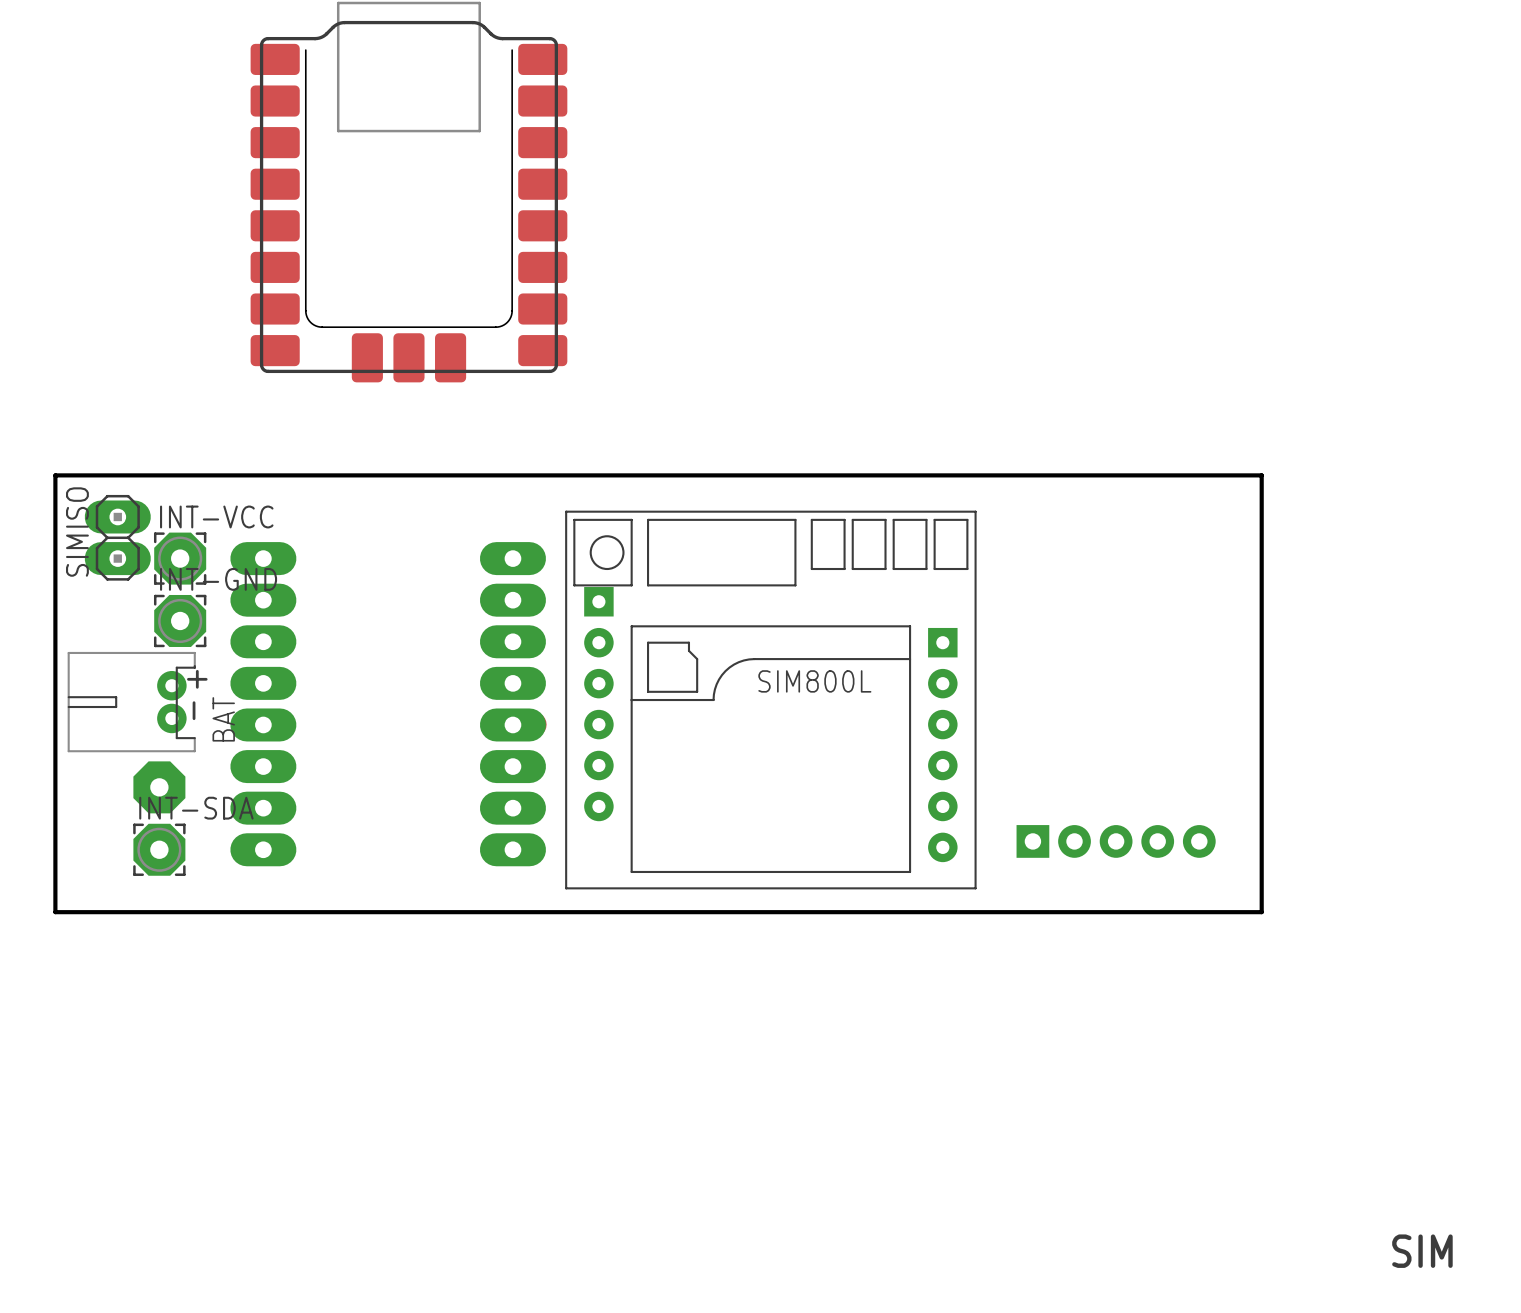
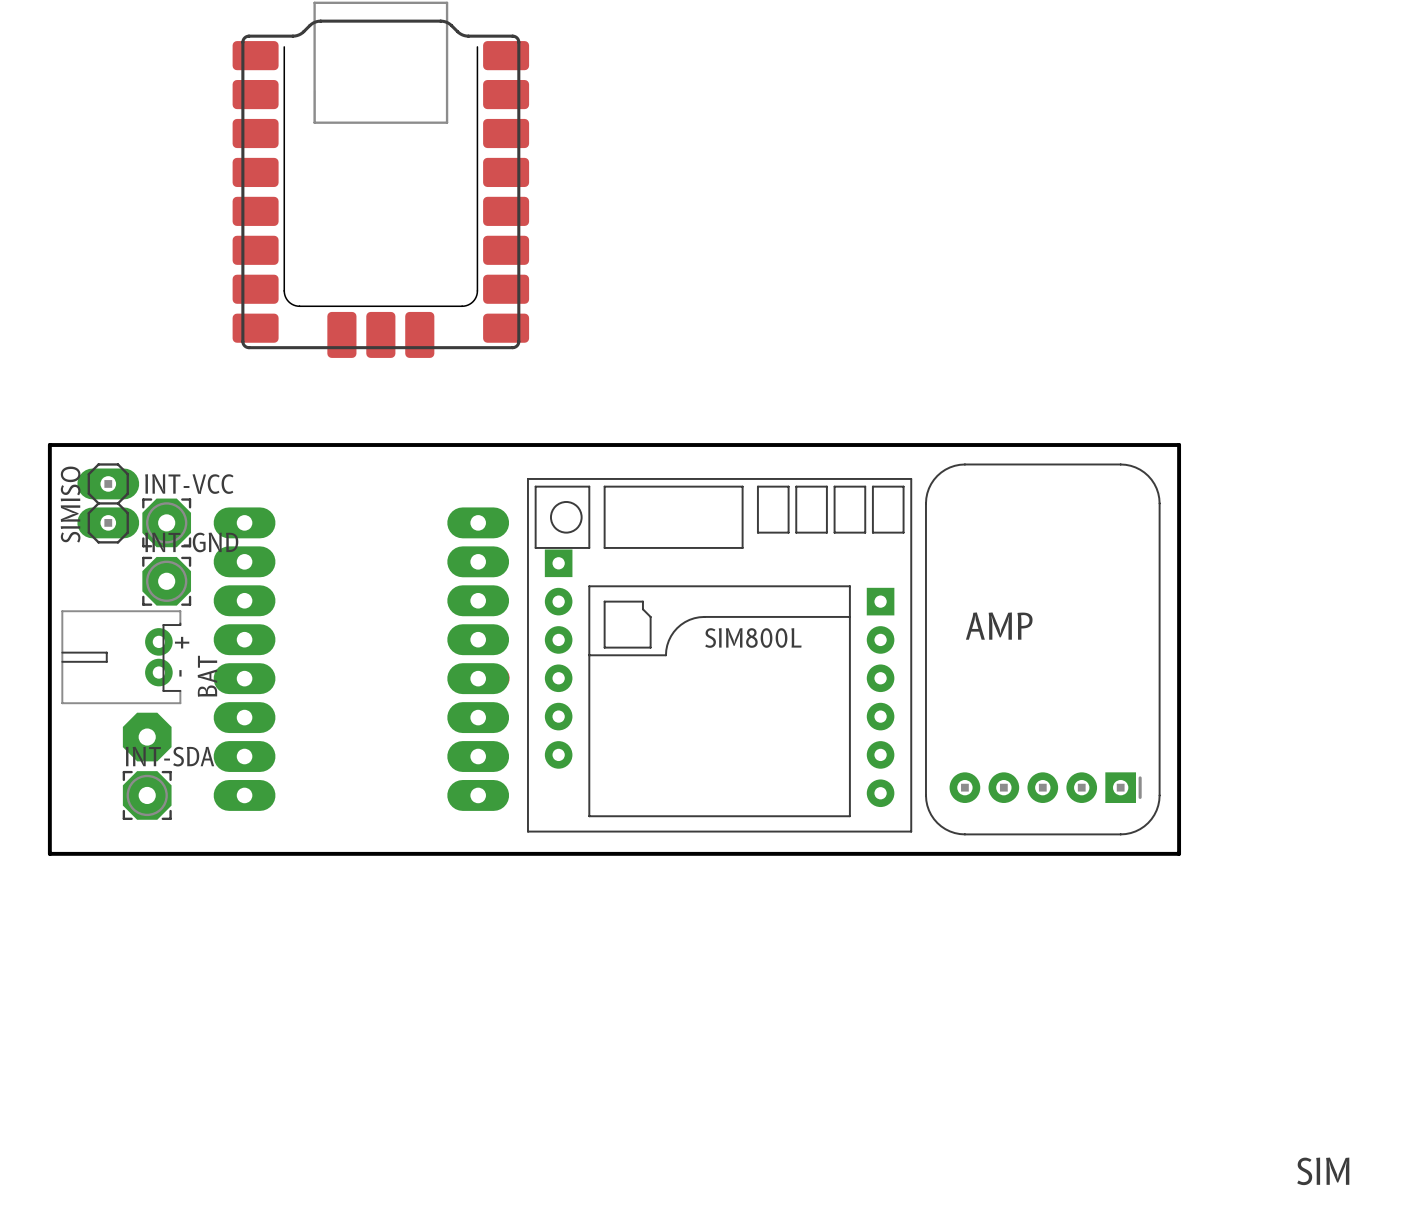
line: none -> (964, 464) (1125, 464) (1144, 472) (1156, 488) (1159, 503) (1159, 795) (1158, 805) (1151, 819) (1135, 831) (1120, 834) (959, 834) (941, 826) (928, 810) (925, 795) (926, 498) (928, 488) (937, 475) (950, 467) (964, 464)
text: none -> AMP (999, 626)
part side: bottom (1116, 841) -> top (1045, 787)

